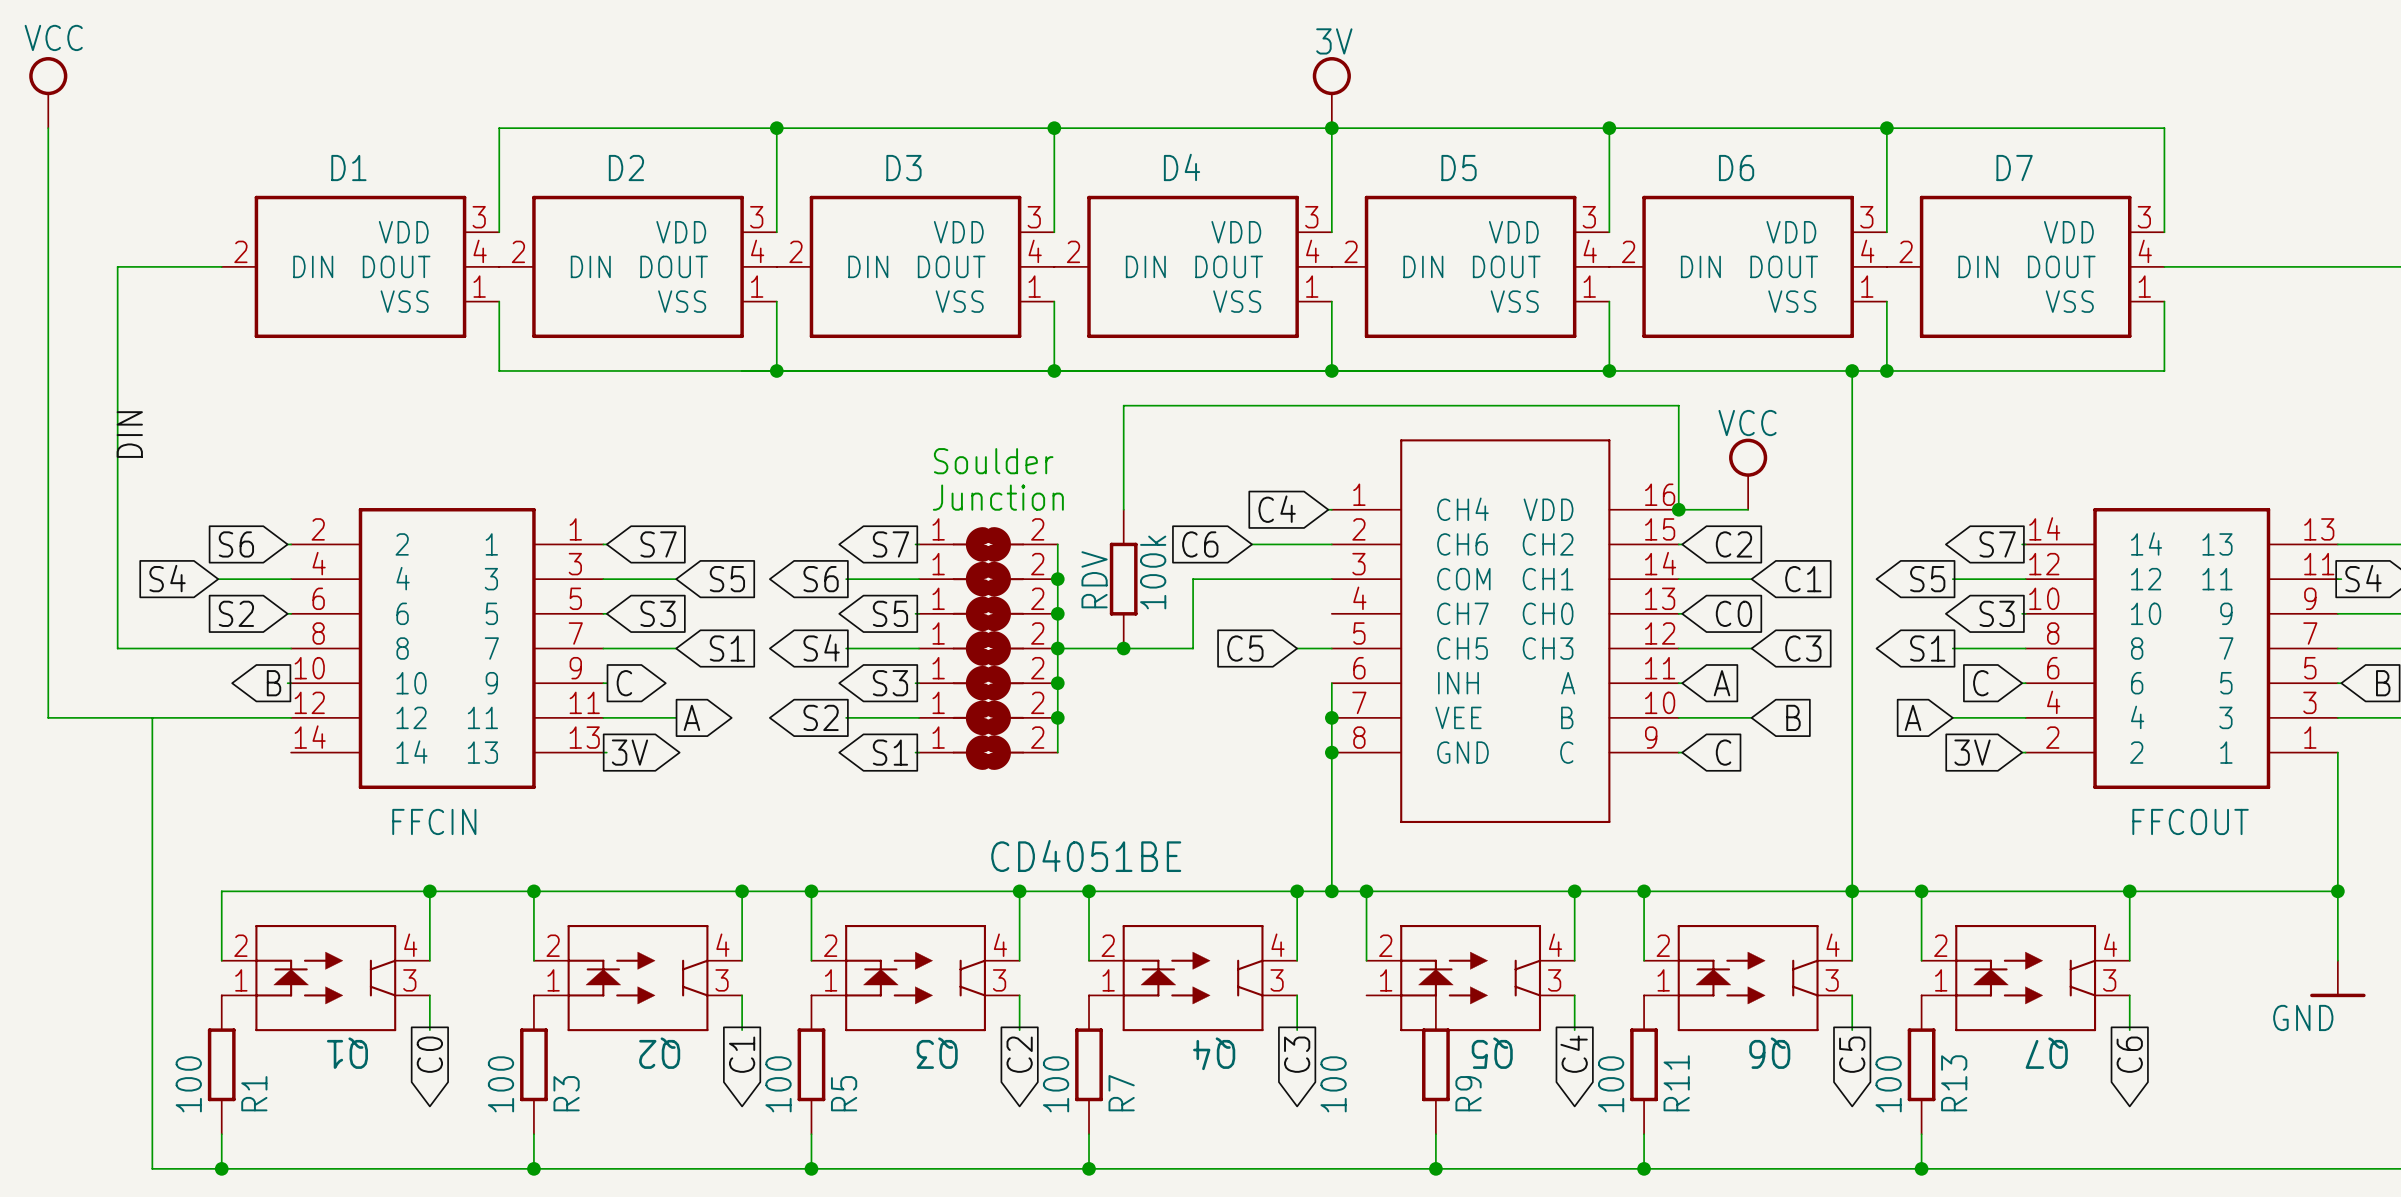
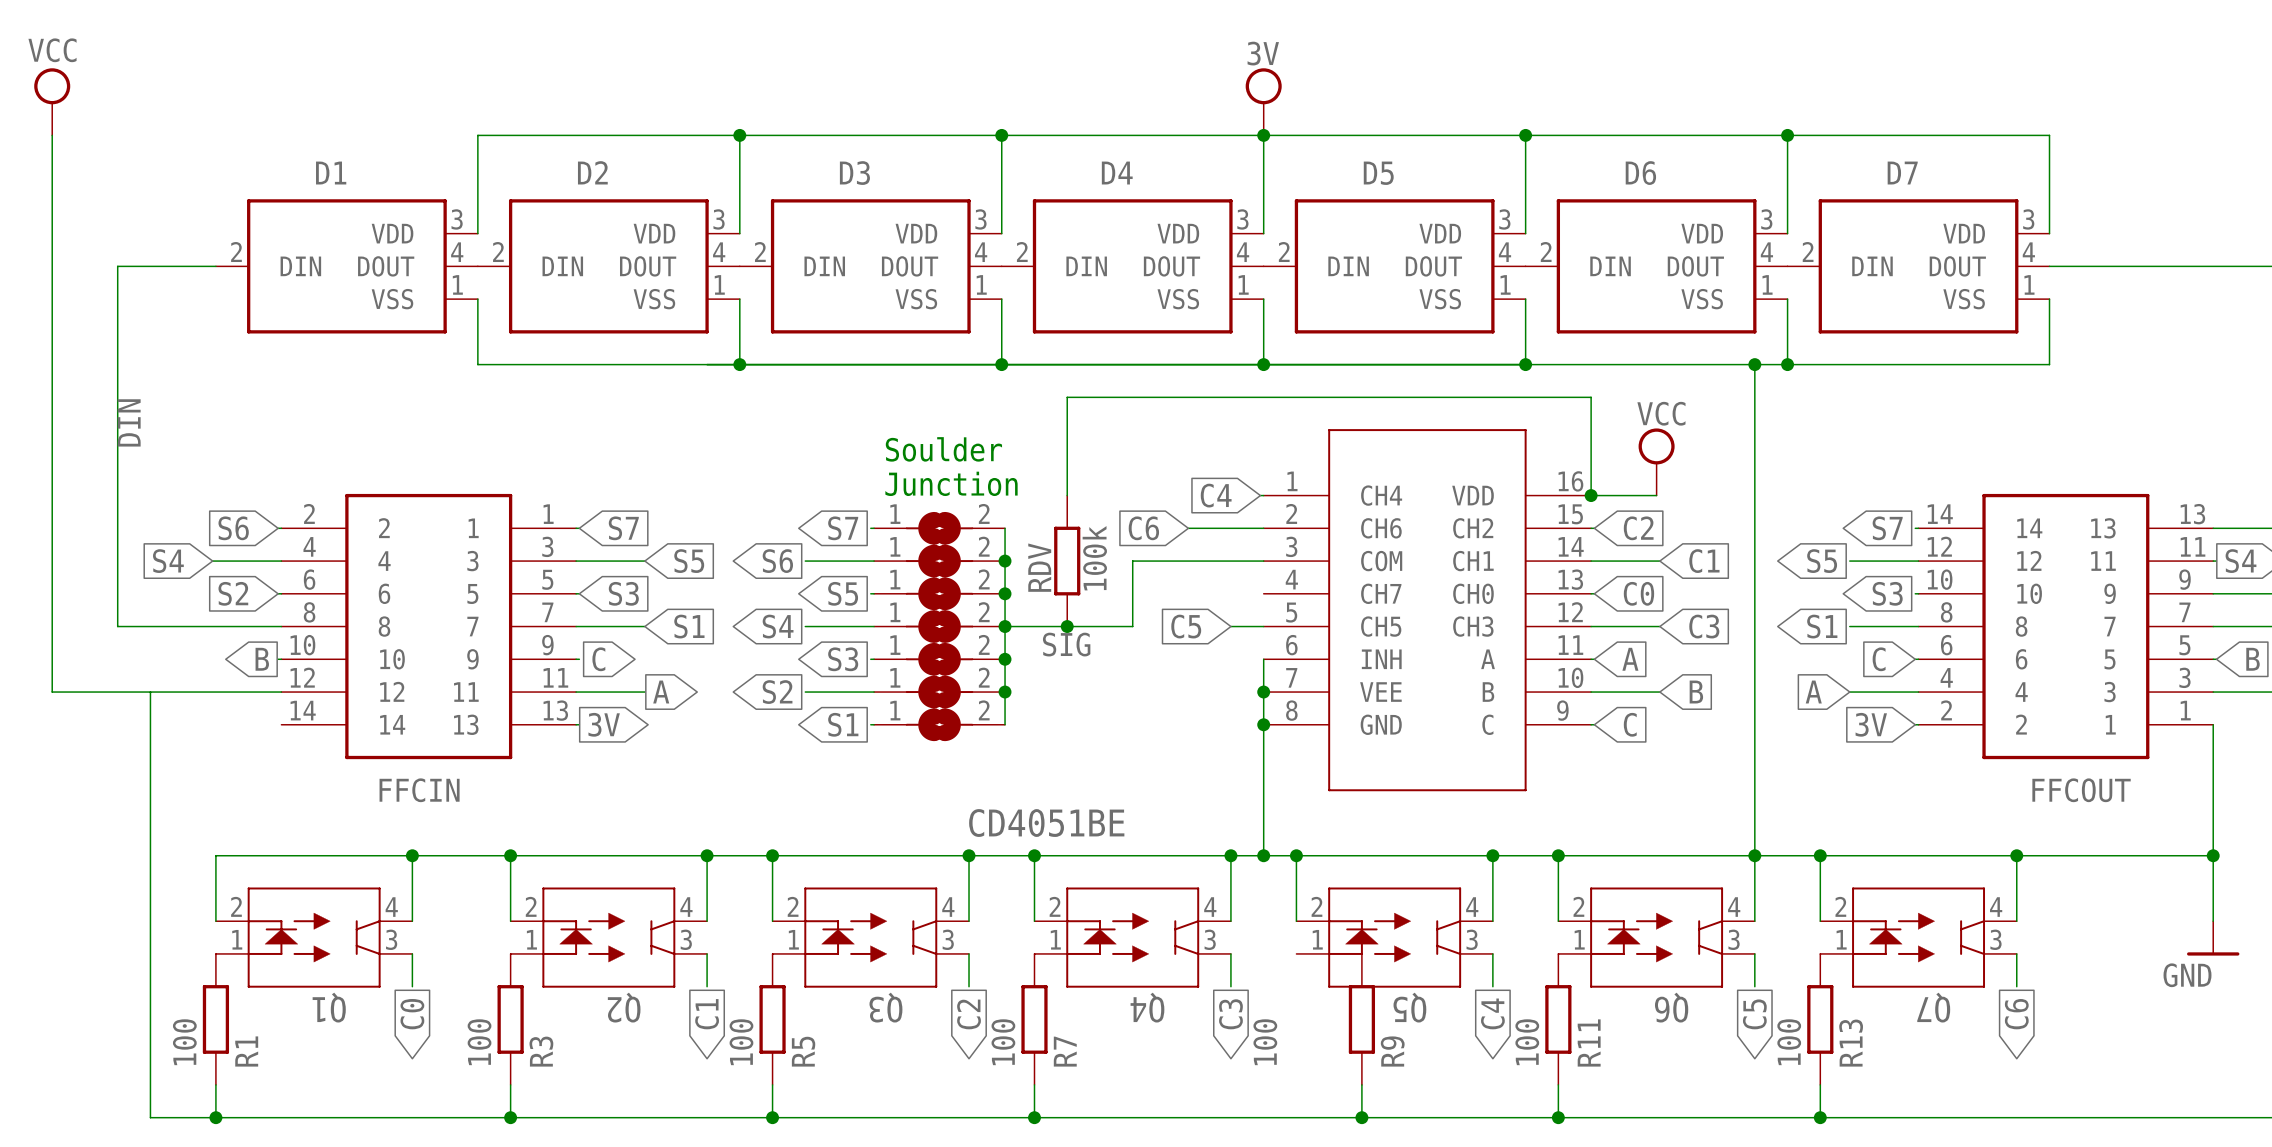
label: none -> SIG (1066, 644)

